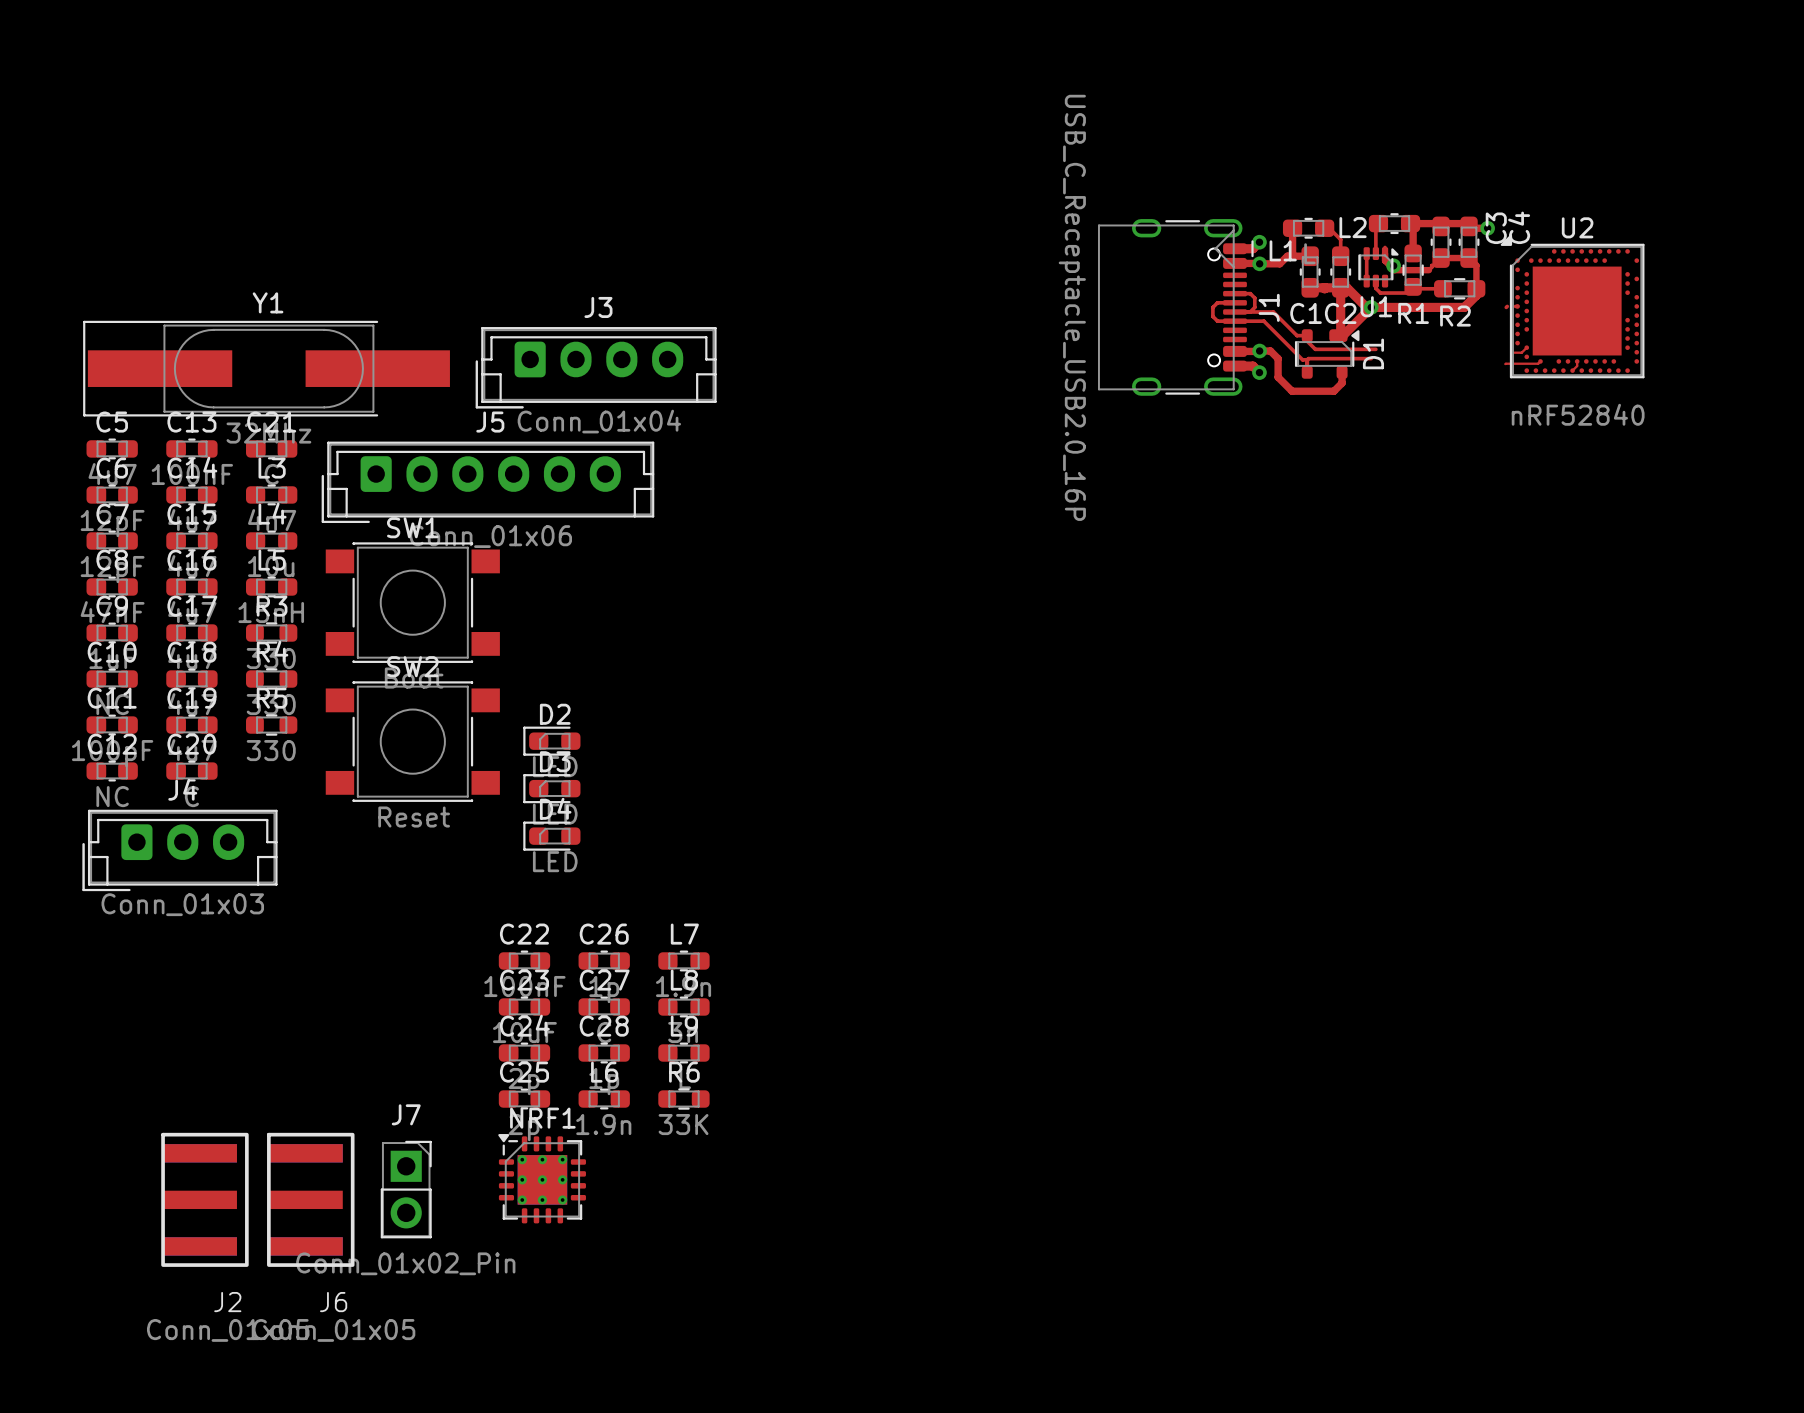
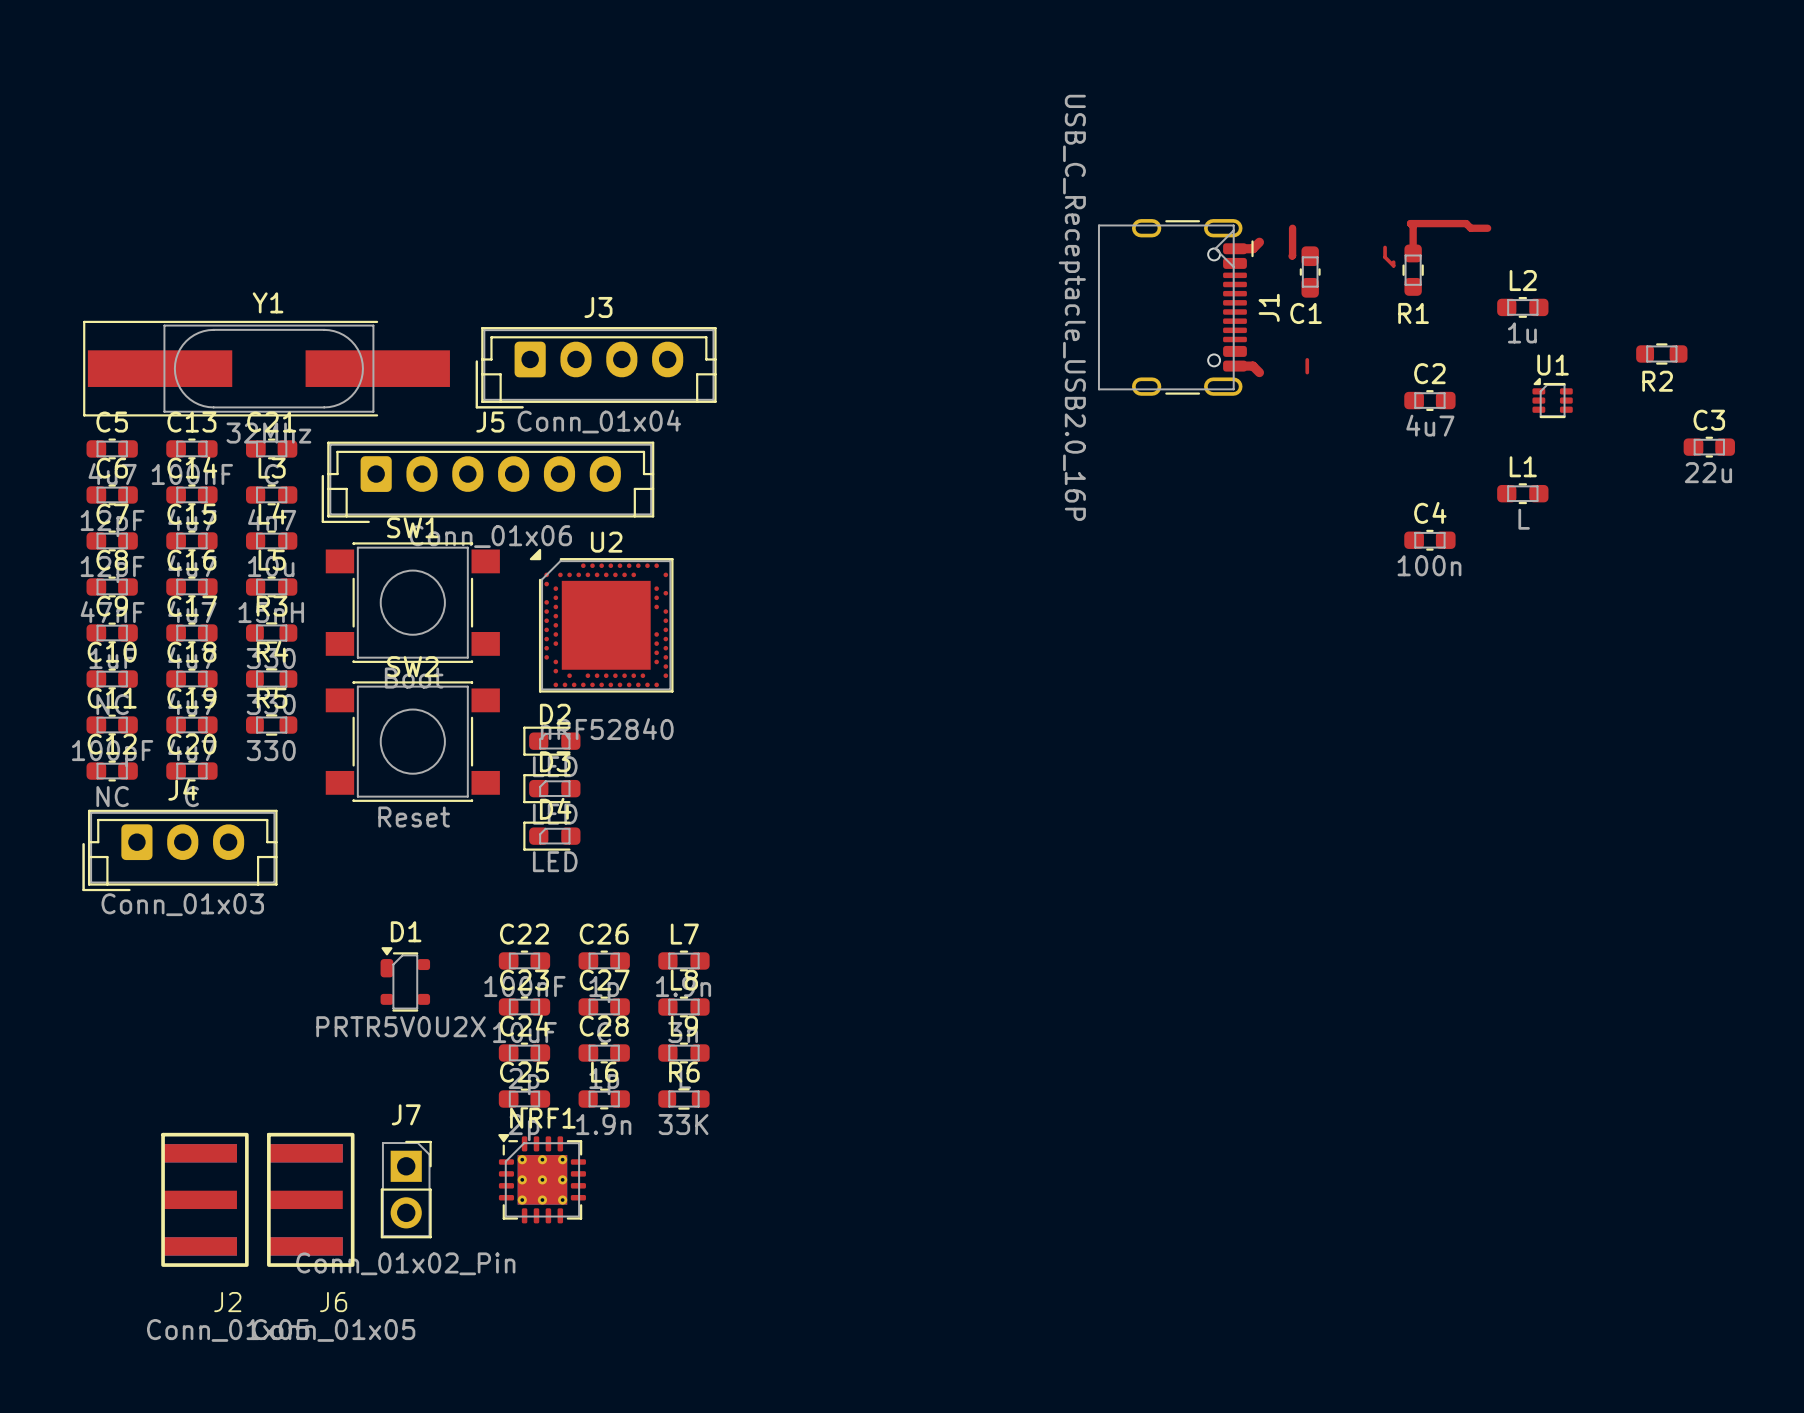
top track: (1378, 223) (1375, 226) (1375, 256) -> none
L2 position: (1394, 223) -> (1522, 307)
L2 name position: L2 (1353, 227) -> L2 (1523, 280)
C4 name position: C4 (1519, 227) -> C4 (1430, 512)
L1 position: (1308, 228) -> (1522, 493)
top track: (1324, 228) (1329, 228) (1340, 239) (1340, 256) -> none
via: (1487, 228) -> none
C3 name position: C3 (1496, 228) -> C3 (1709, 420)
via: (1259, 242) -> none
C3 rotation: 0° (1441, 242) -> 90° clockwise (1709, 447)
C3 position: (1441, 242) -> (1709, 447)
C4 rotation: 0° (1469, 242) -> 90° clockwise (1429, 540)
C4 position: (1469, 242) -> (1429, 540)
L1 name position: L1 (1283, 250) -> L1 (1523, 466)
top track: (1385, 253) (1385, 260) (1394, 270) (1428, 270) (1441, 258) (1469, 258) (1476, 265) (1476, 295) (1464, 307) (1366, 307) (1346, 287) (1310, 287) -> none
top track: (1310, 256) (1287, 256) (1279, 263) (1235, 263) -> none
top track: (1366, 256) (1366, 283) -> none
via: (1259, 263) -> none
via: (1393, 265) -> none
U1 rotation: 0° (1378, 267) -> 90° counterclockwise (1552, 397)
U1 position: (1378, 267) -> (1552, 397)
C2 rotation: 0° (1340, 272) -> 90° clockwise (1429, 400)
C2 position: (1340, 272) -> (1429, 400)
top track: (1375, 283) (1375, 288) (1380, 293) (1408, 293) (1413, 286) (1415, 288) (1442, 288) -> none
top track: (1340, 287) (1340, 333) (1338, 335) (1342, 335) (1371, 307) -> none
R2 position: (1459, 288) -> (1661, 353)
top track: (1235, 293) (1250, 293) (1254, 298) (1254, 307) (1250, 312) -> none
top track: (1235, 302) (1217, 302) (1212, 307) (1212, 316) (1217, 321) (1263, 321) (1302, 359) (1371, 358) -> none
U1 name position: U1 (1376, 306) -> U1 (1553, 365)
top track: (1507, 306) (1506, 307) -> none
top track: (1515, 306) (1517, 306) -> none
U2 position: (1572, 306) -> (601, 620)
via: (1371, 307) -> none
top track: (1235, 312) (1273, 312) (1297, 335) (1307, 335) (1307, 341) (1315, 349) (1375, 349) -> none
C2 name position: C2 (1340, 313) -> C2 (1429, 373)
L2 value: none -> 1u (1522, 332)
top track: (1526, 347) (1521, 352) (1514, 352) -> none
top track: (1235, 351) (1270, 351) (1278, 358) (1278, 377) (1292, 391) (1333, 391) (1342, 383) (1342, 372) -> none
via: (1259, 351) -> none
D1 rotation: 0° (1327, 353) -> 90° counterclockwise (405, 979)
D1 position: (1327, 353) -> (405, 979)
top track: (1540, 361) (1538, 363) (1506, 363) -> none
top track: (1577, 361) (1577, 366) (1572, 370) -> none
top track: (1505, 363) (1505, 364) -> none
via: (1259, 372) -> none
C2 value: none -> 4u7 (1430, 425)
C3 value: none -> 22u (1708, 472)
C4 value: none -> 100n (1429, 565)
D1 value: none -> PRTR5V0U2X (401, 1026)

